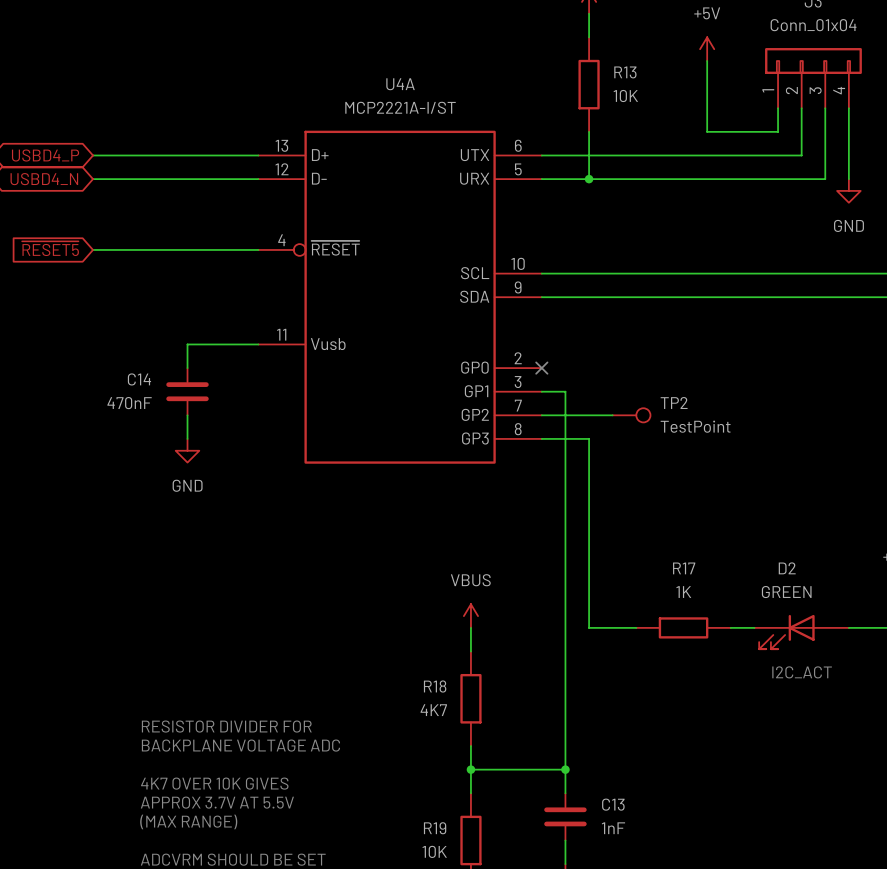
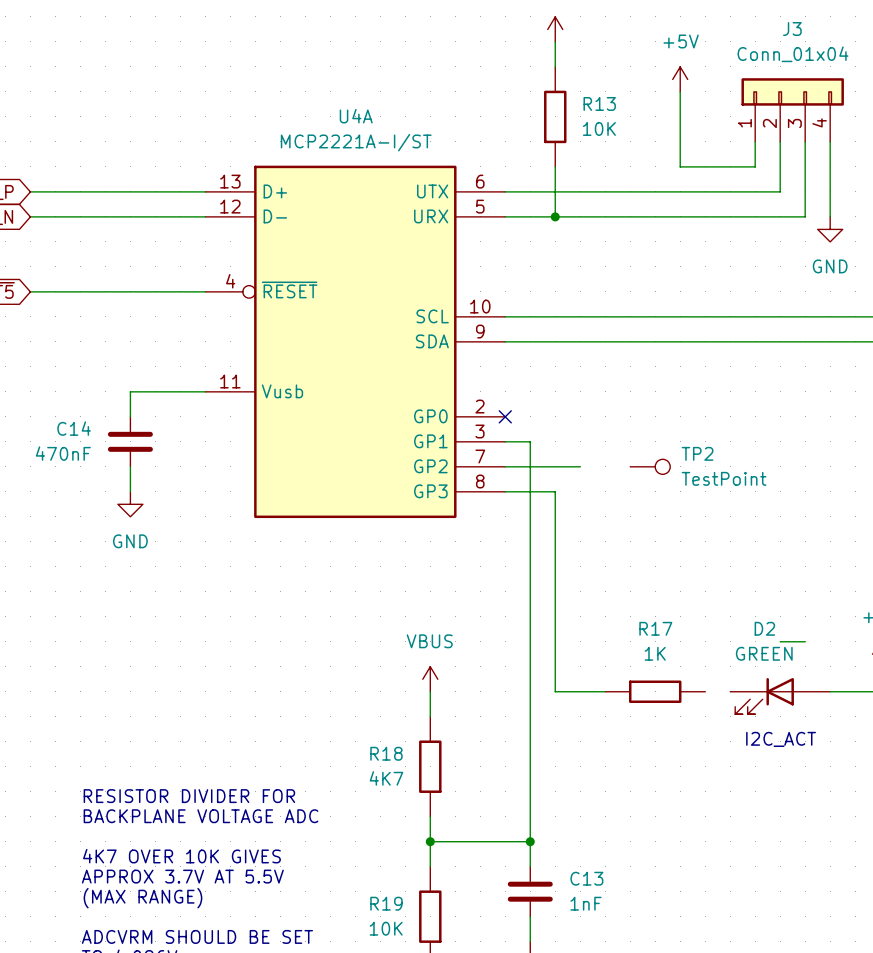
TP2 position: (631, 415) -> (650, 466)
wire: (730, 627) (754, 627) -> (780, 641) (805, 641)

